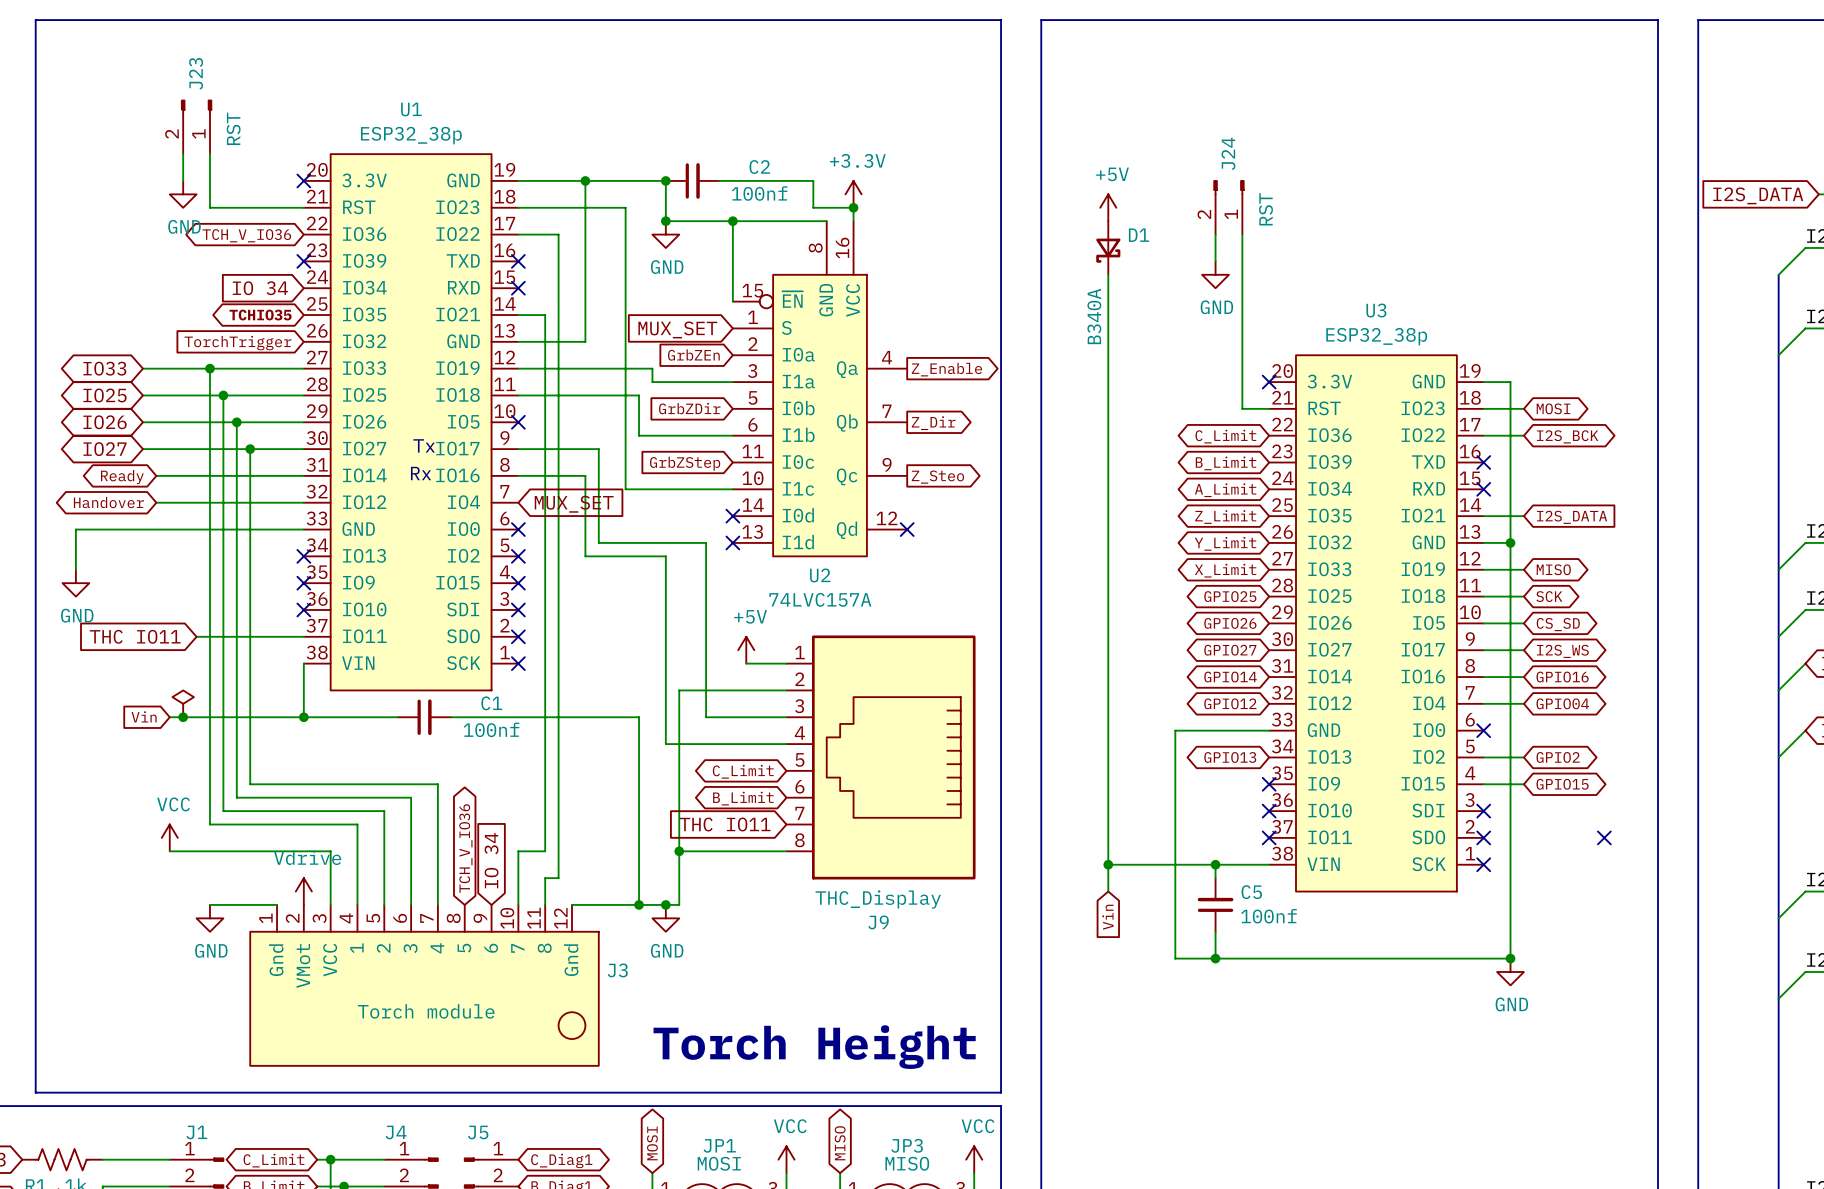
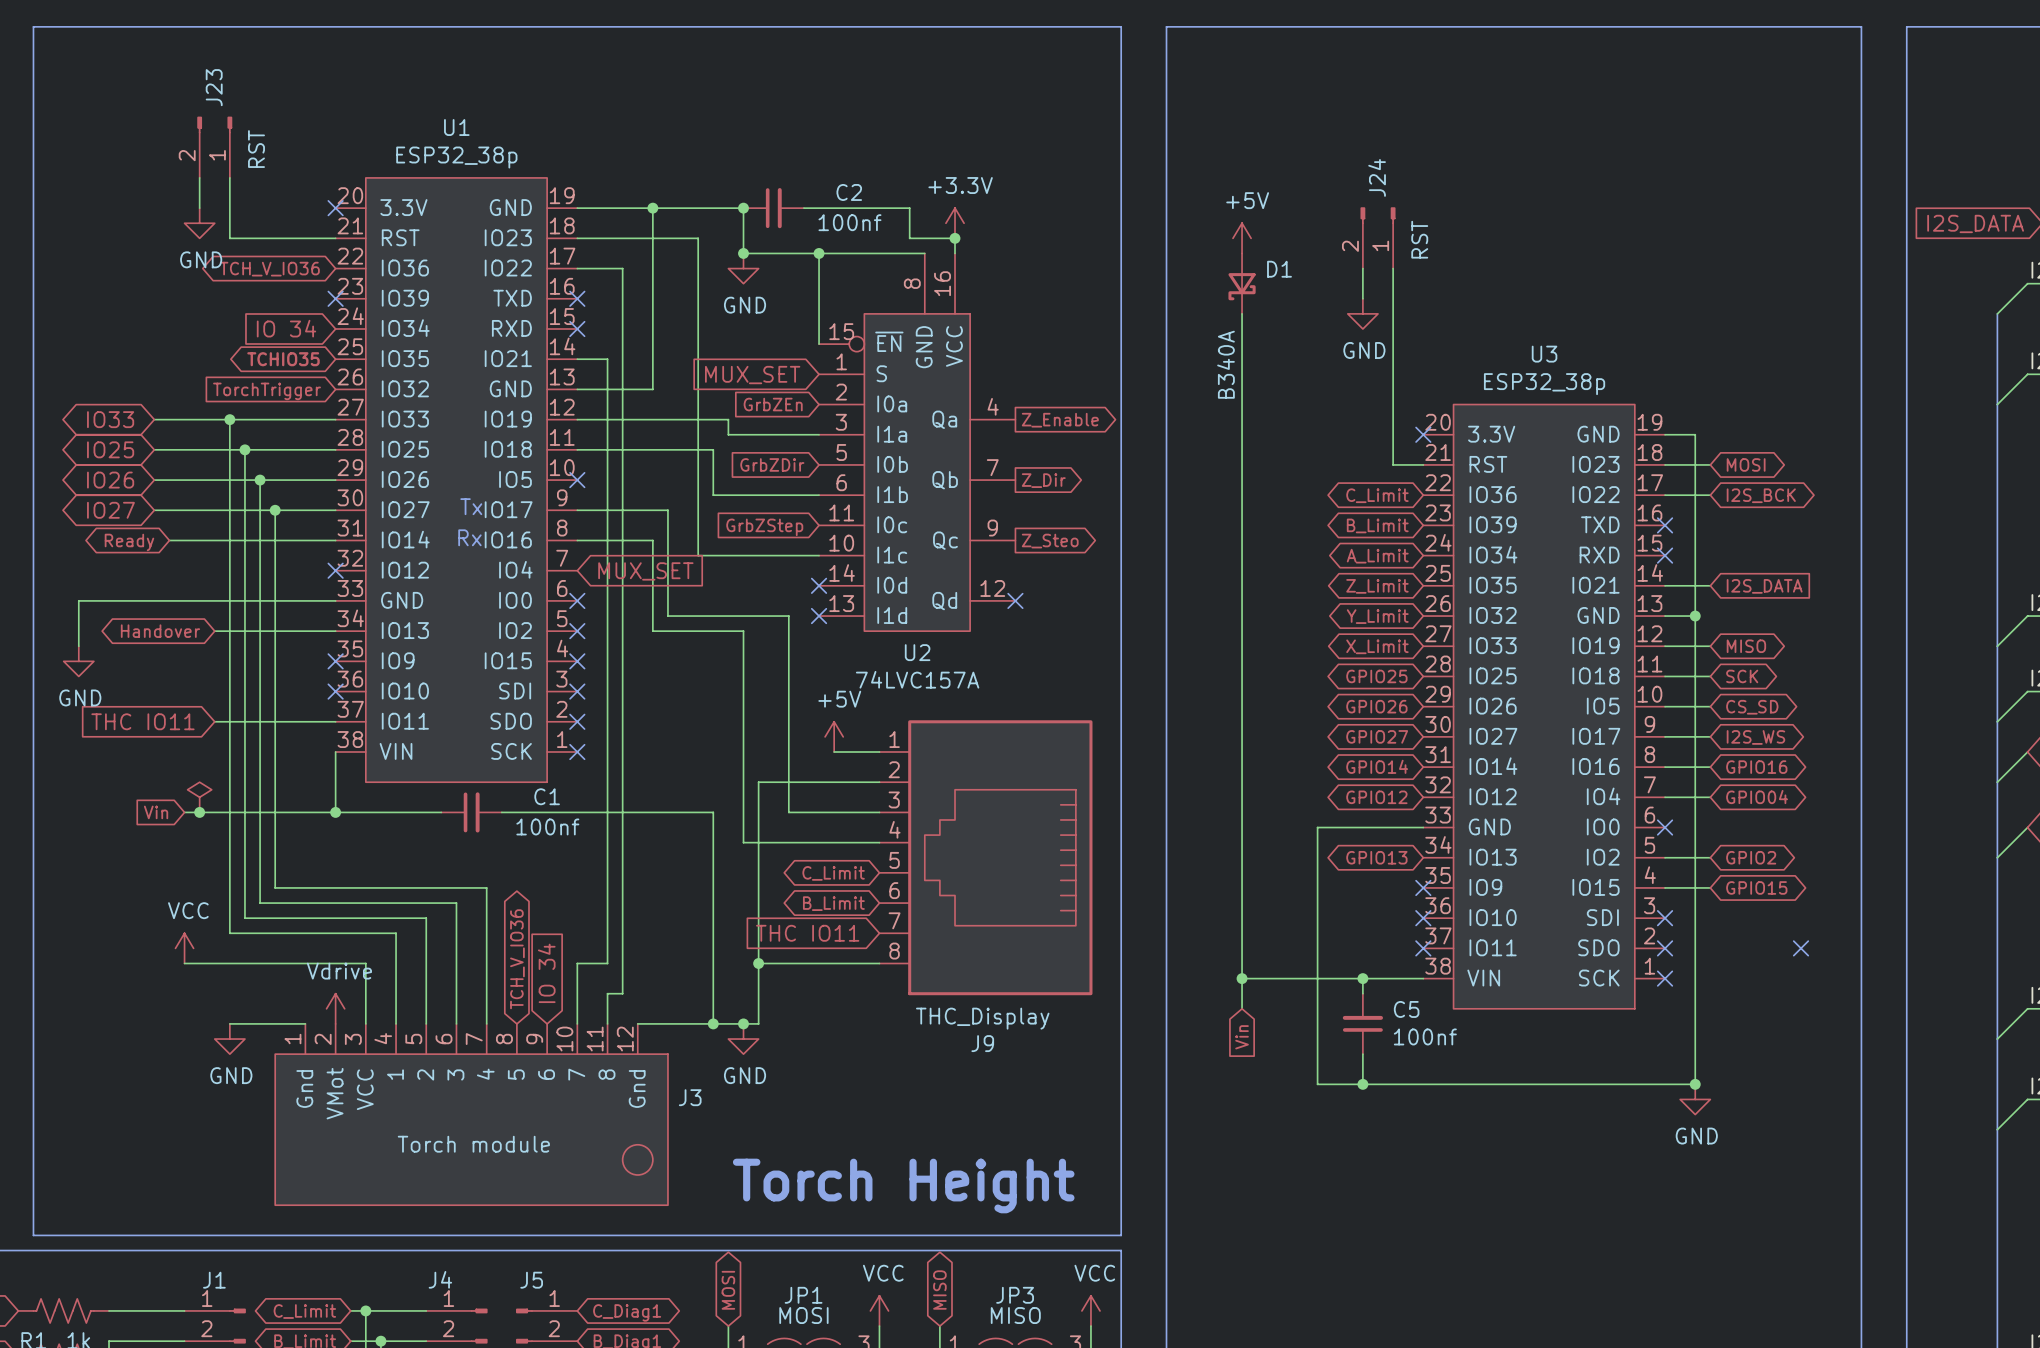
global label position: Handover (108, 502) -> Handover (160, 631)
wire: (156, 502) (303, 502) -> none
wire: none -> (214, 631) (335, 631)
no-connect mark position: (303, 556) -> (335, 570)

